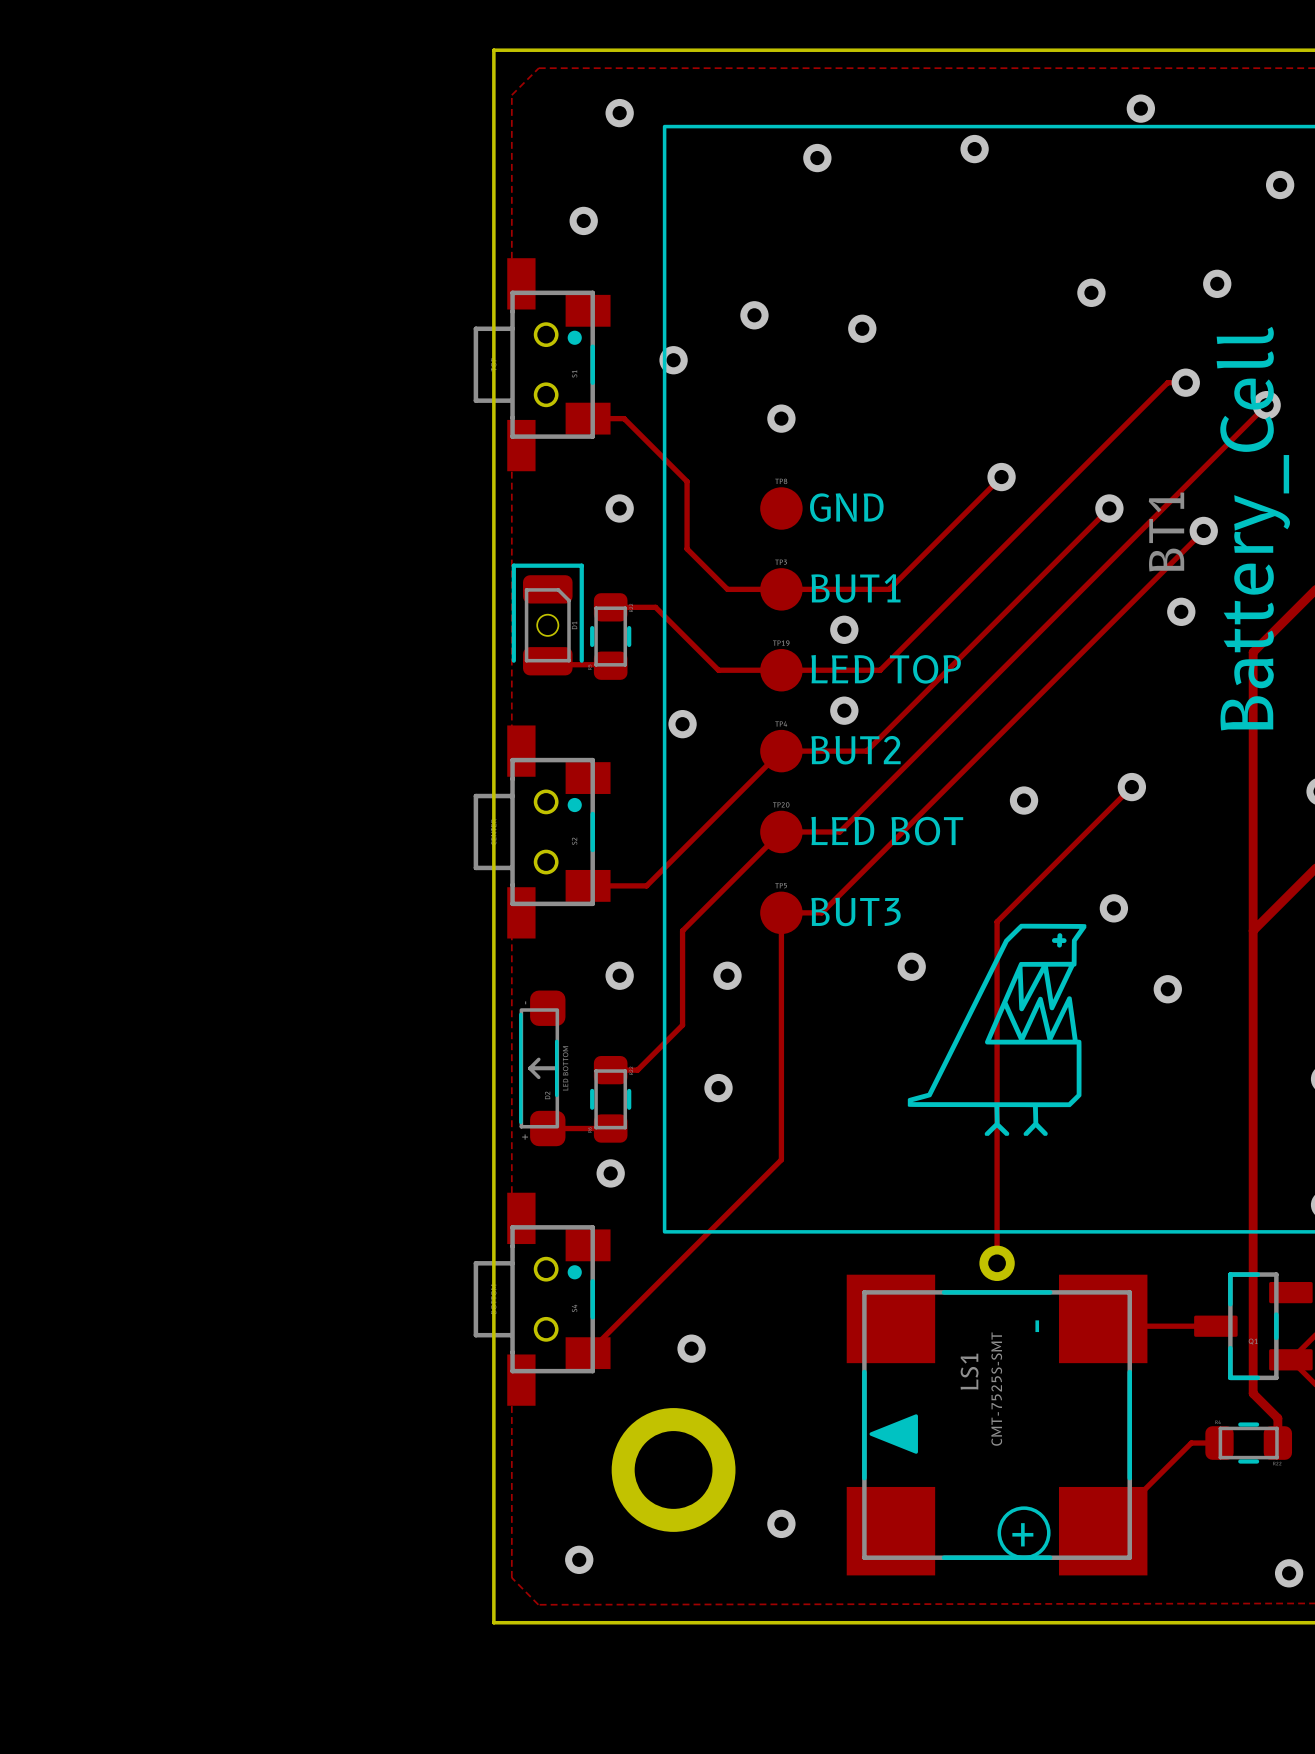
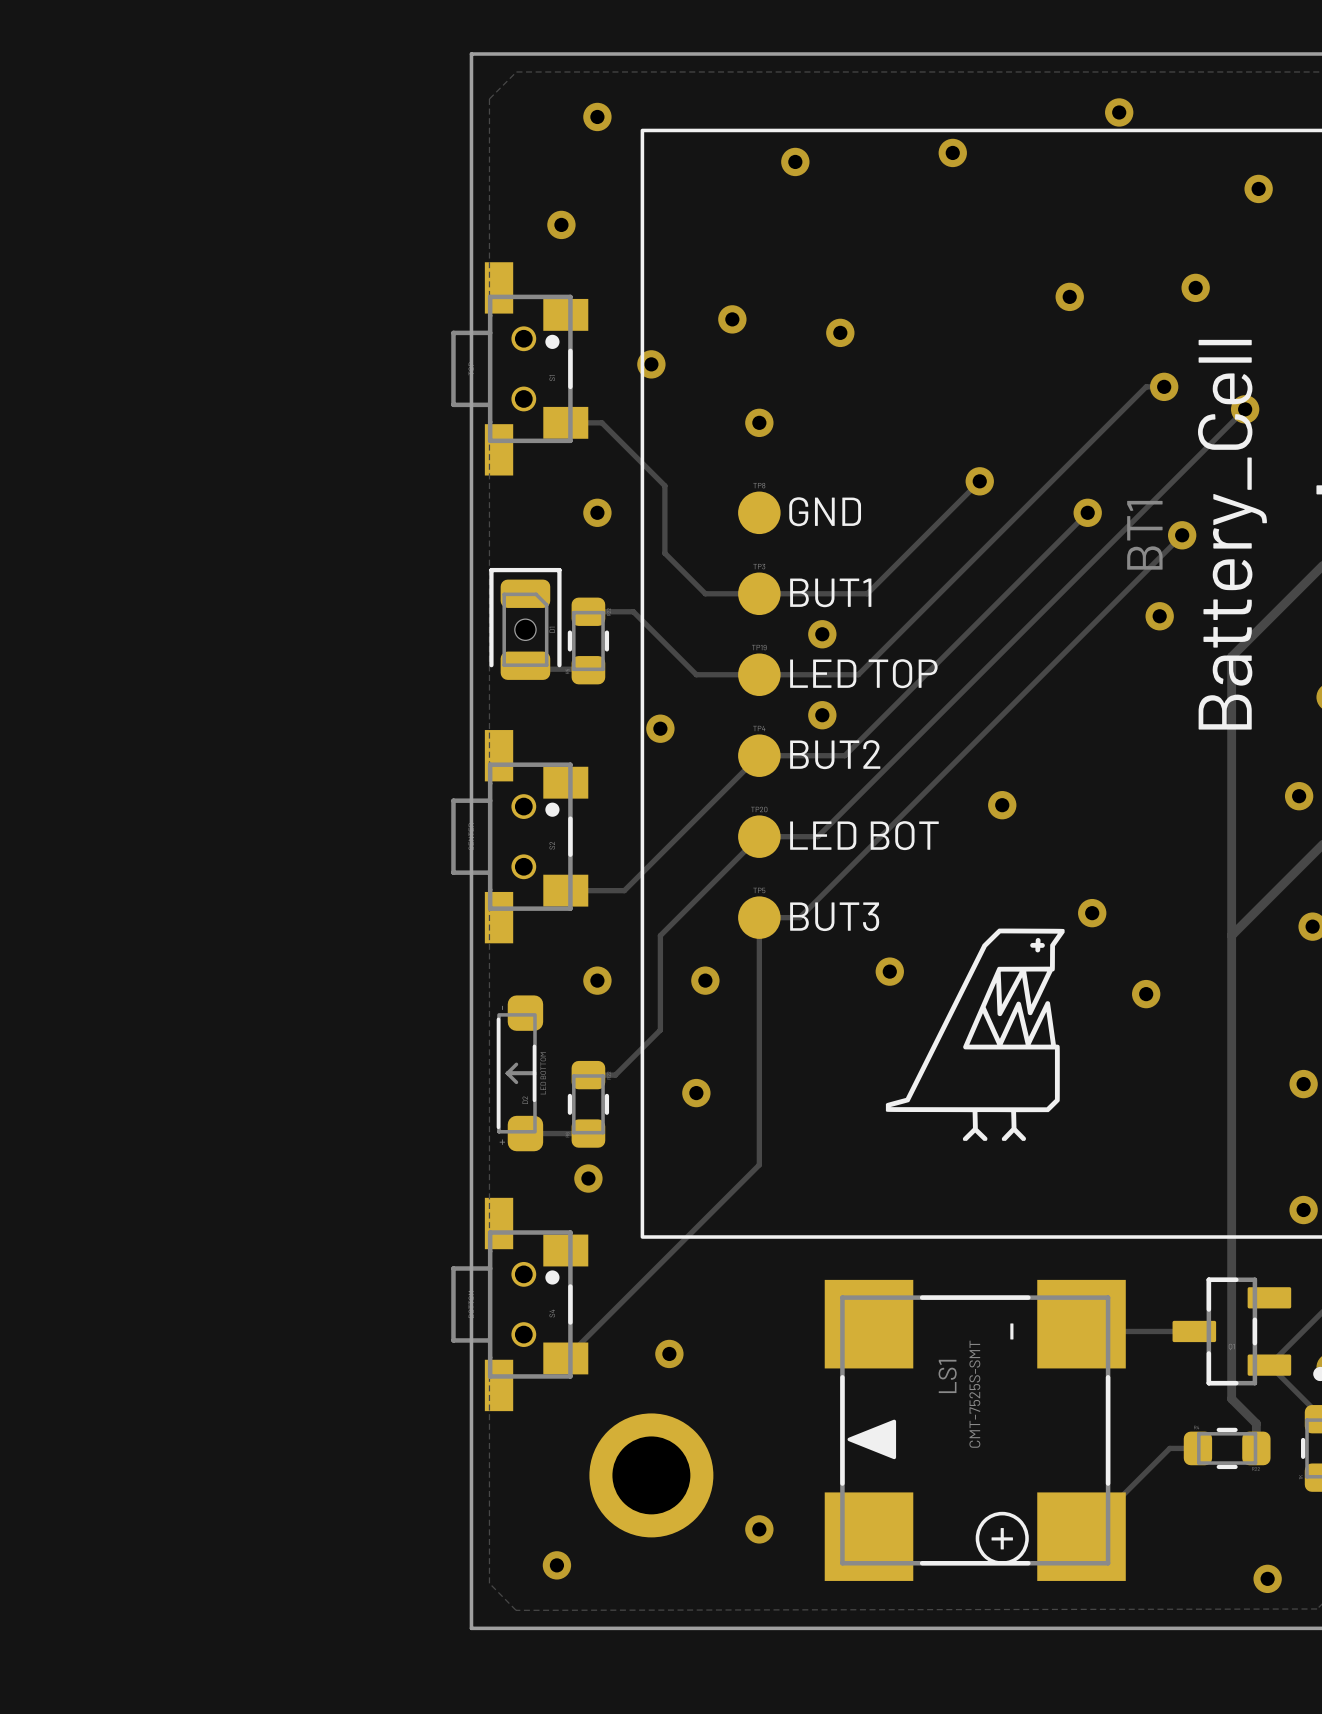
track: (1131, 787) (997, 921) (997, 1263) -> none
via: (1131, 787) -> none
part: (997, 1263) -> none

